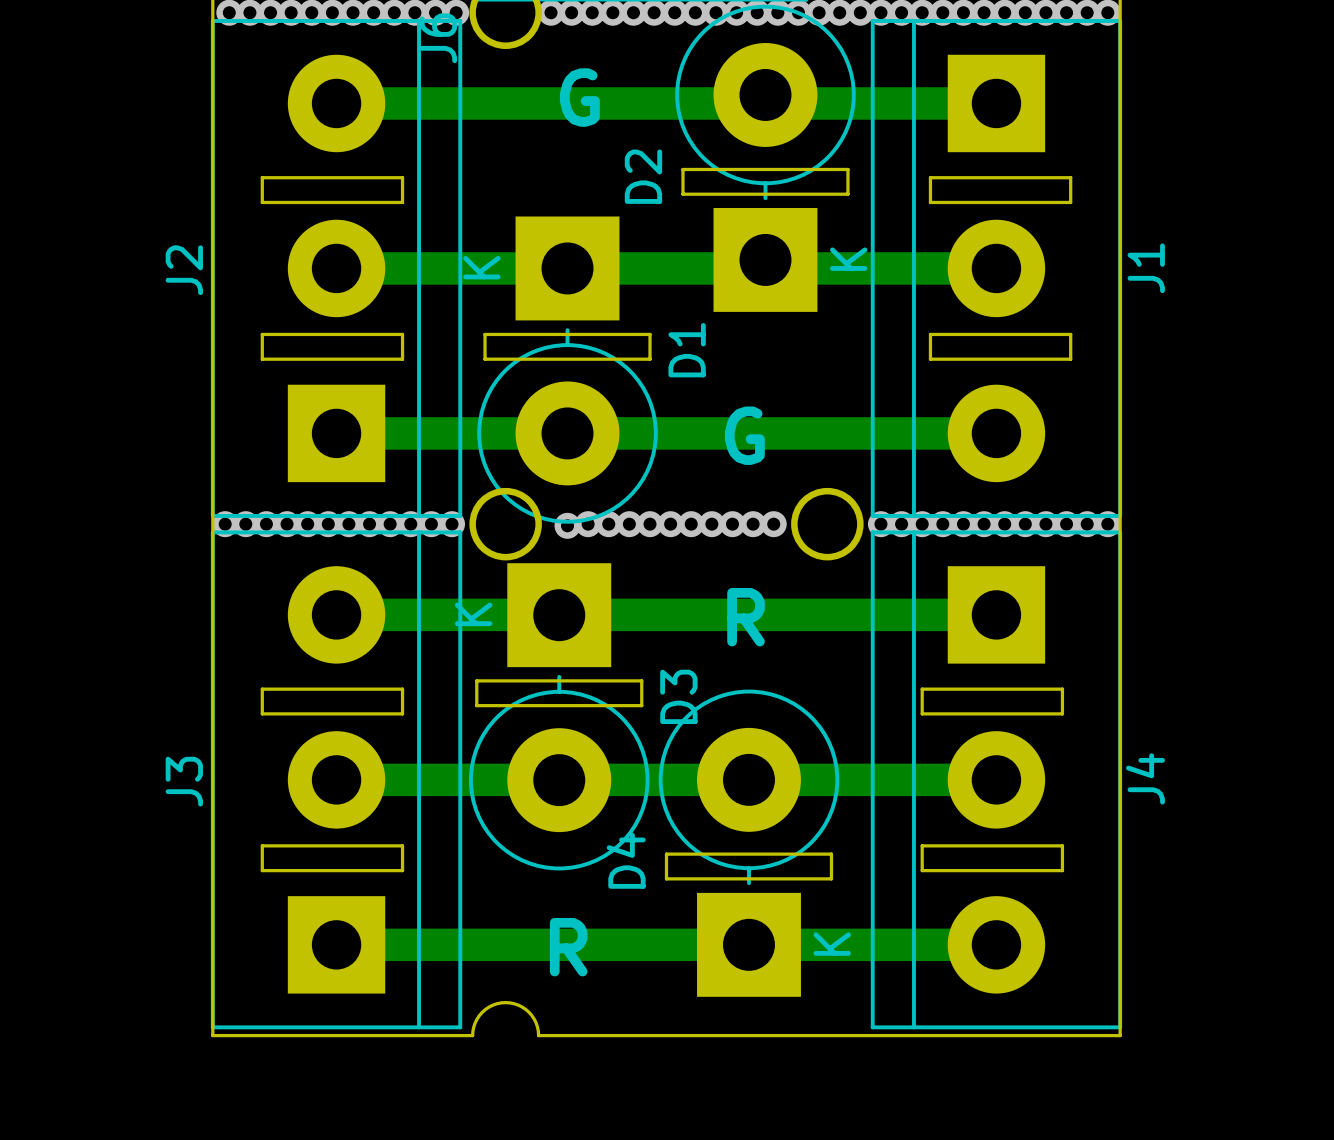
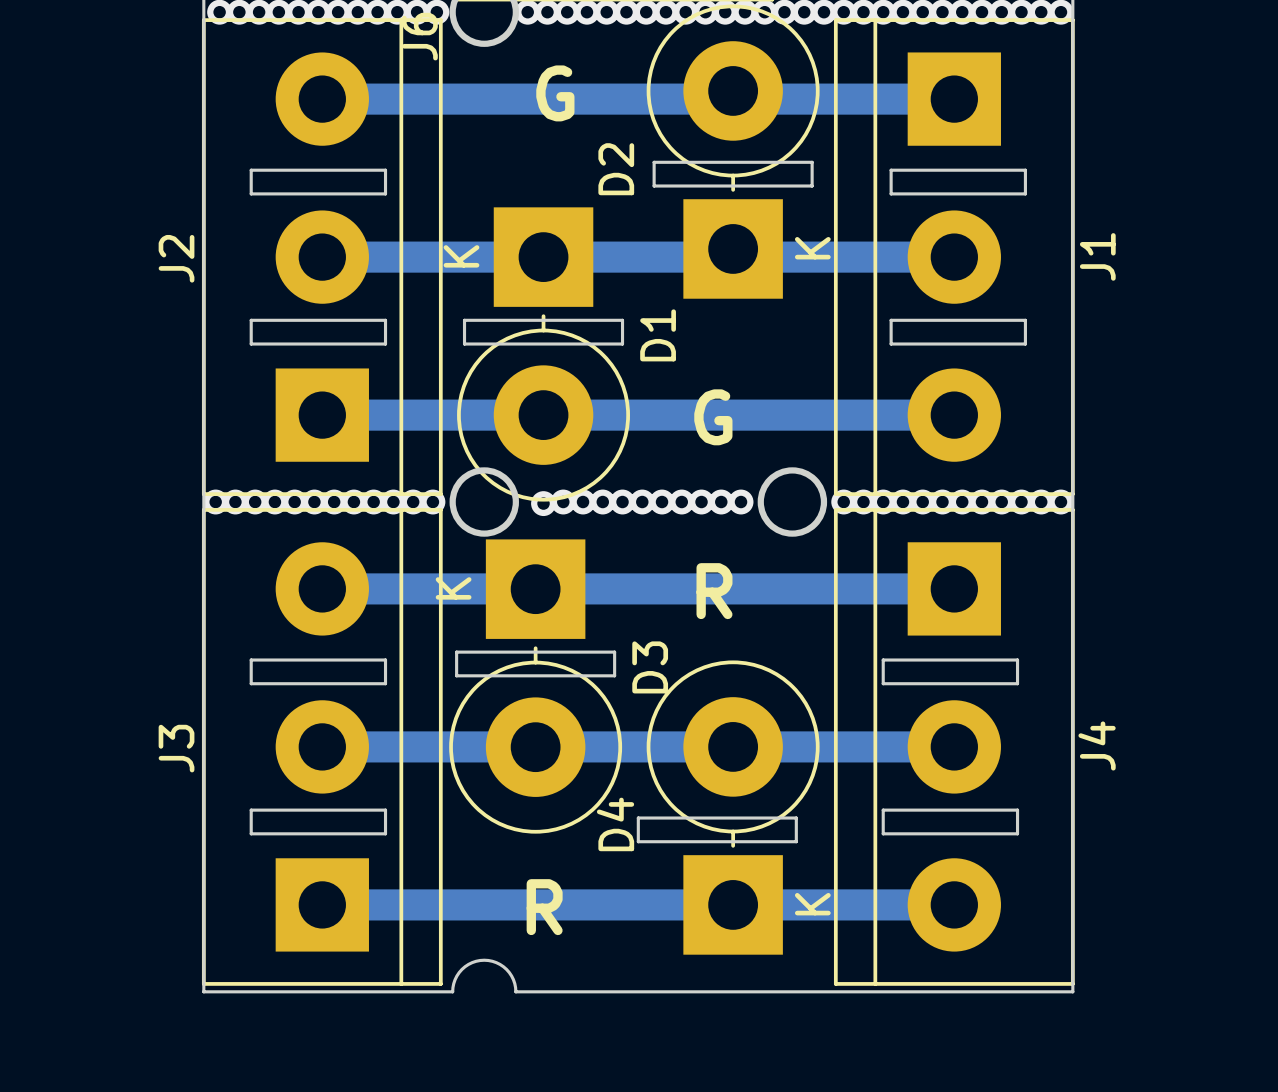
D4 position: (748, 843) -> (733, 807)

